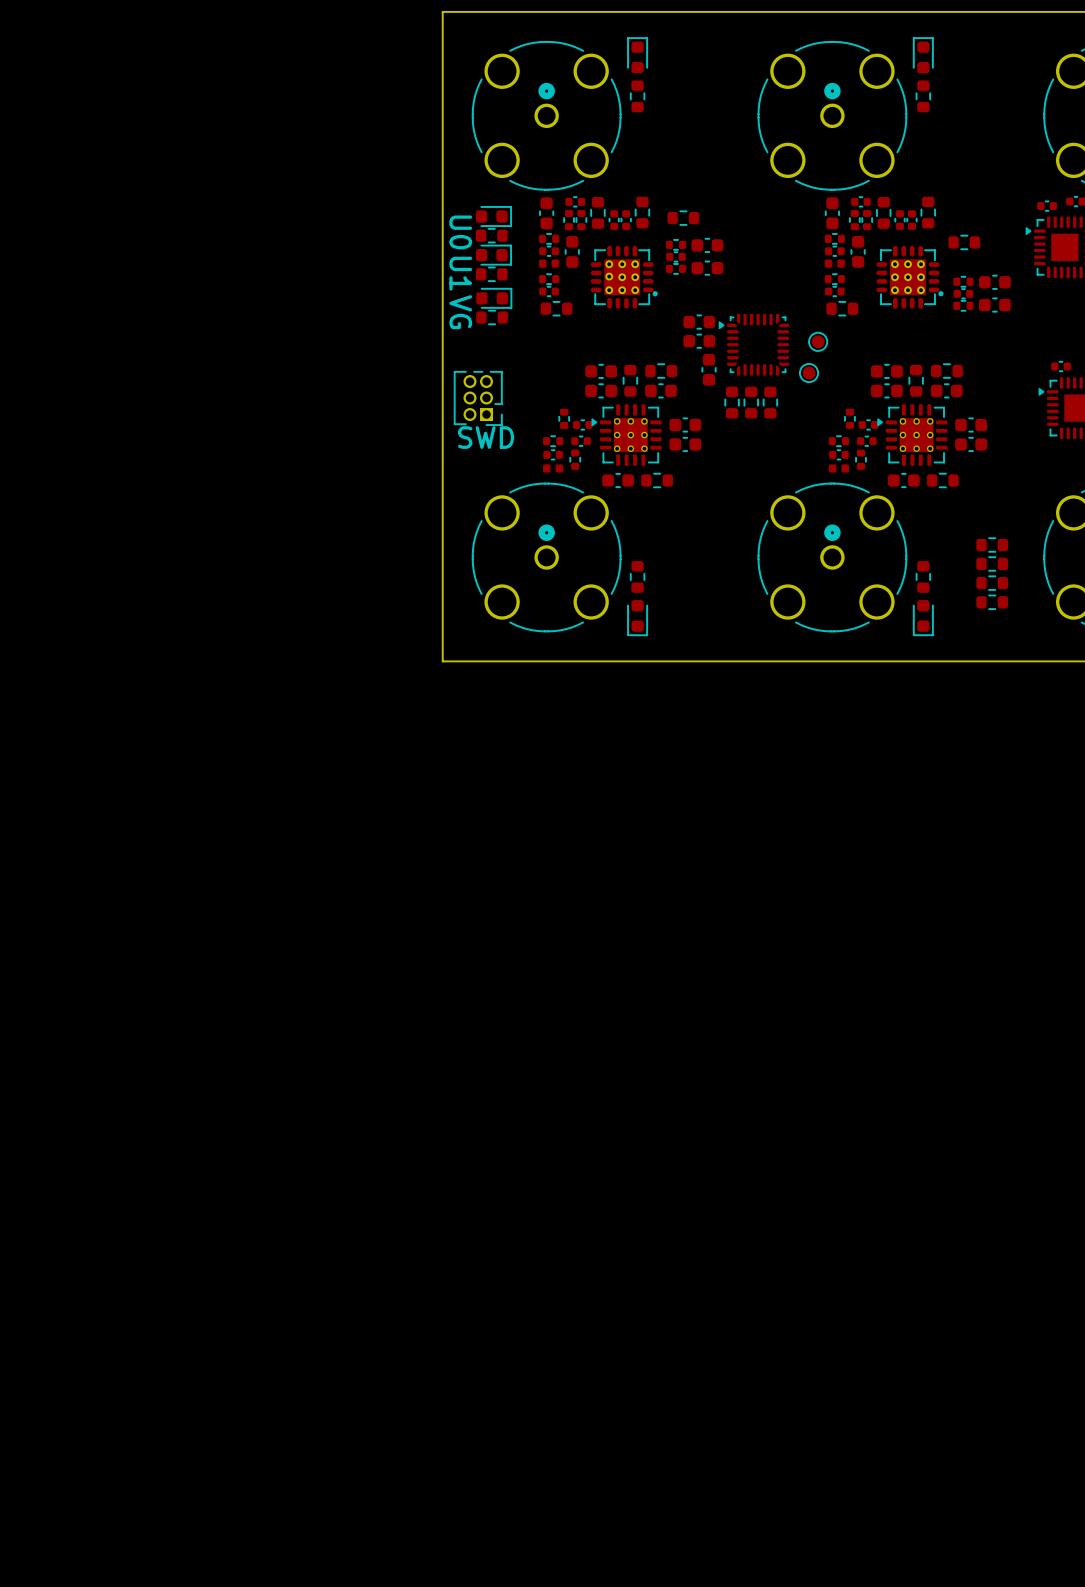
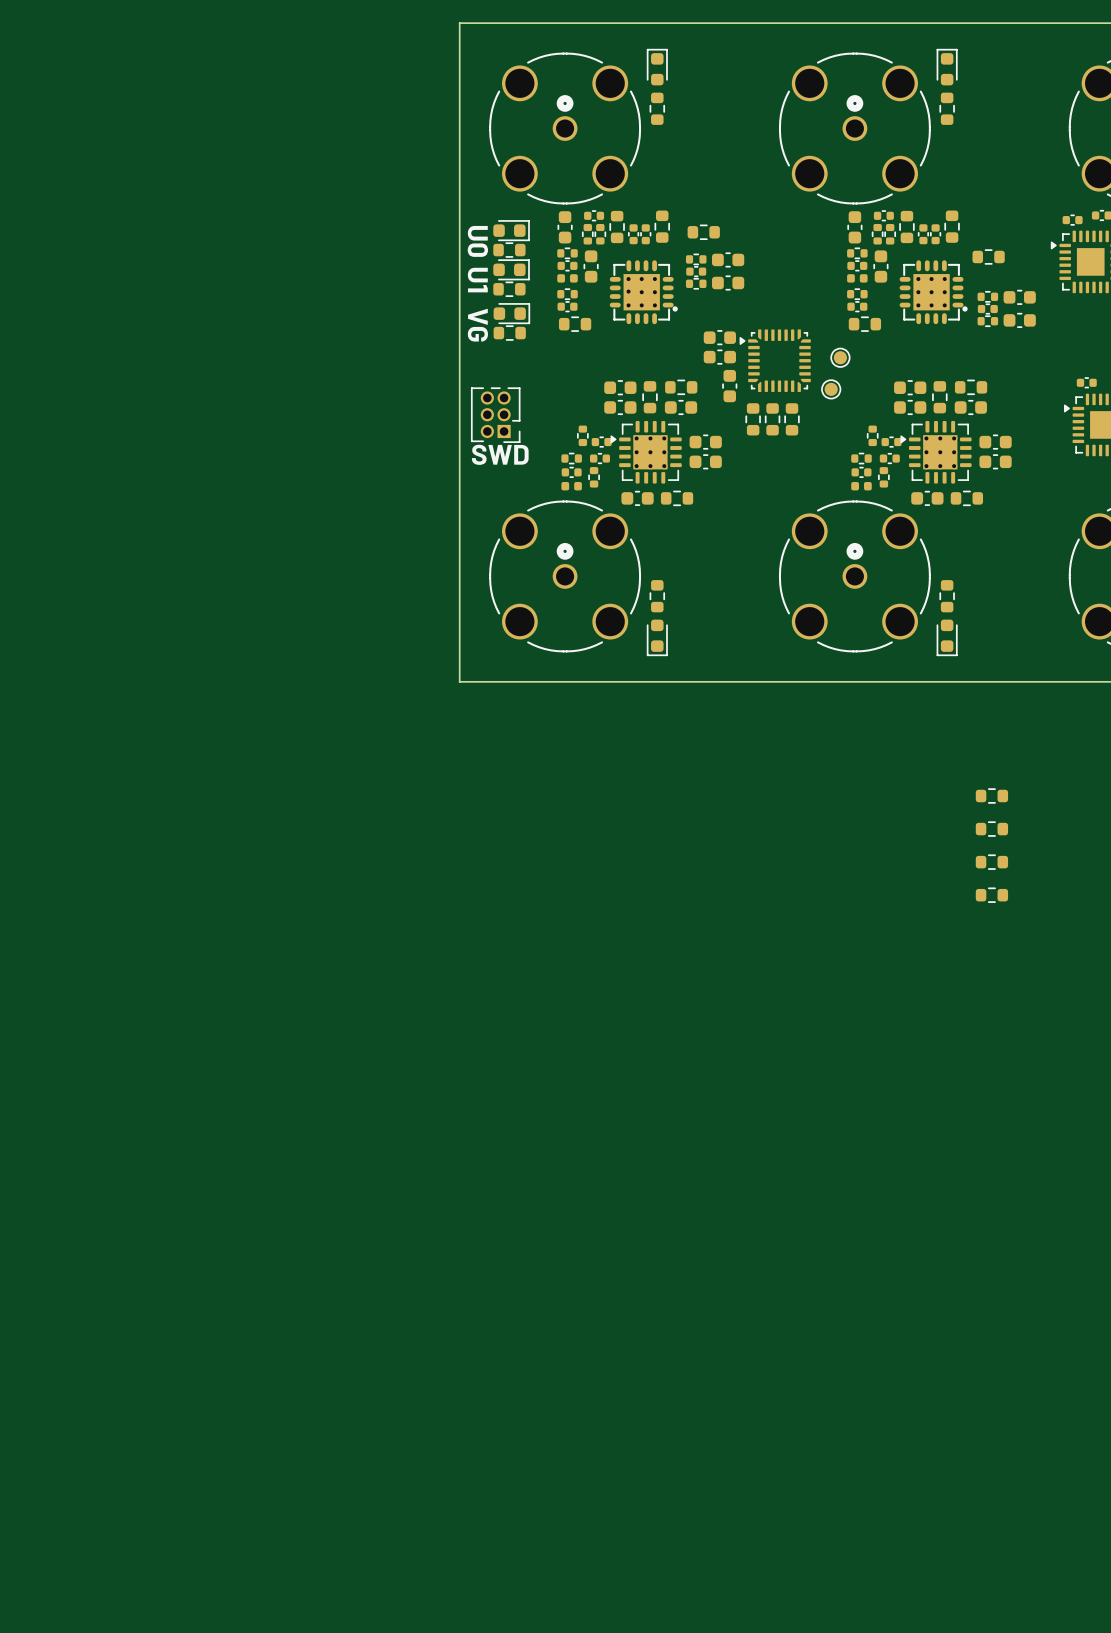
part: (992, 545) -> none
part: (992, 563) -> none
part: (992, 583) -> none
part: (992, 602) -> none
part: none -> (991, 795)
part: none -> (991, 829)
part: none -> (991, 862)
part: none -> (991, 895)

